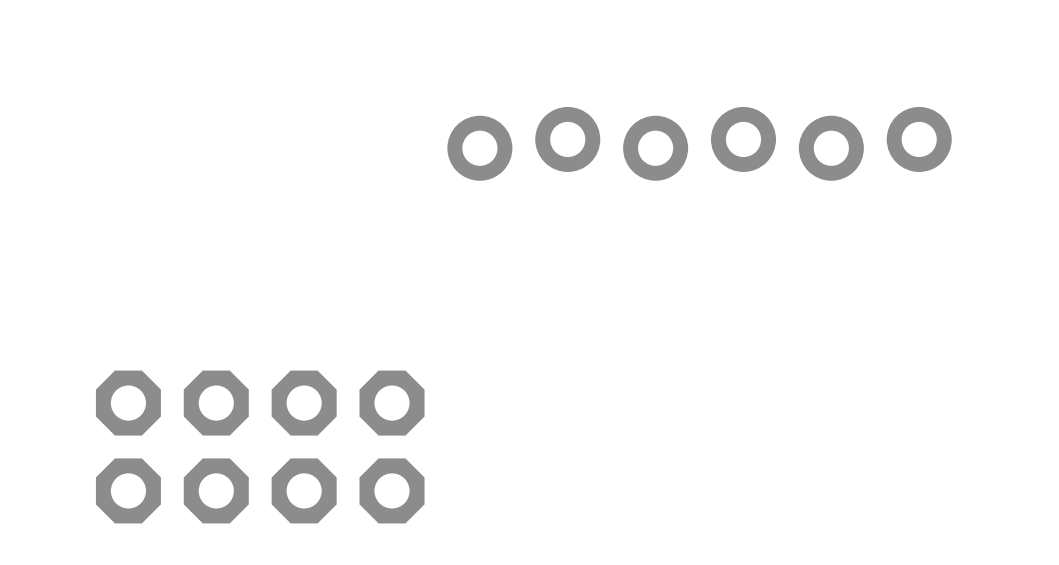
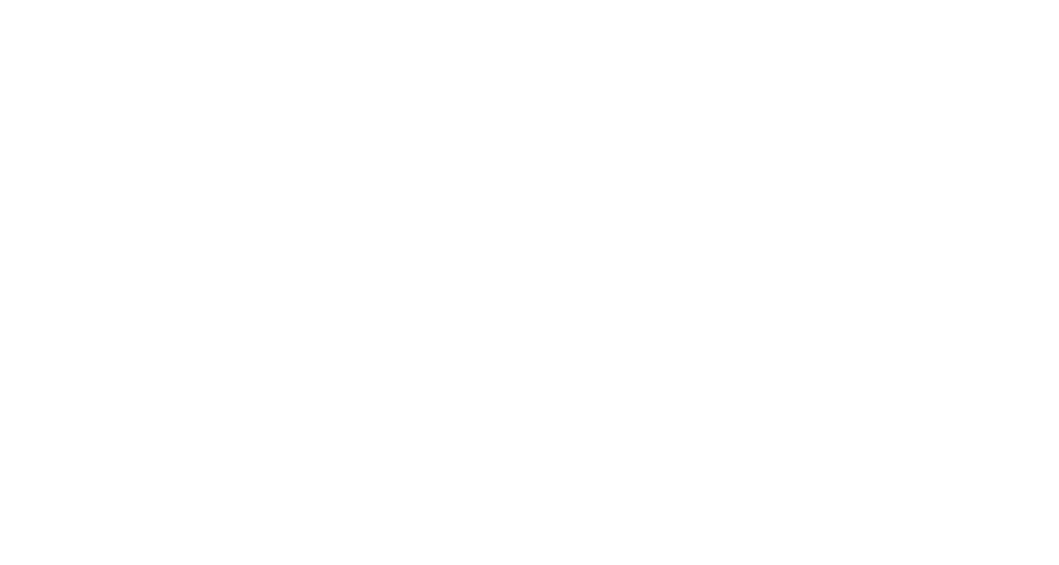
part: (699, 143) -> none
part: (260, 447) -> none

